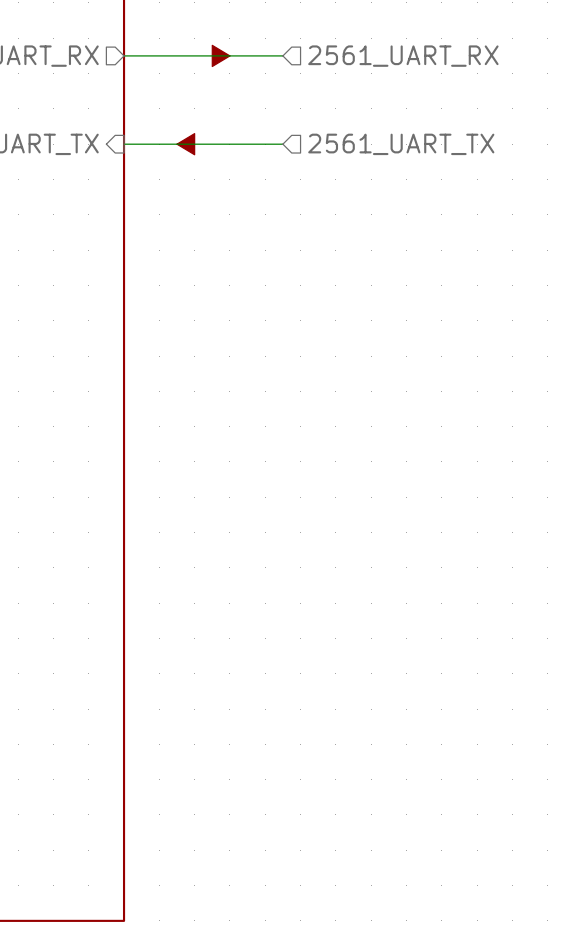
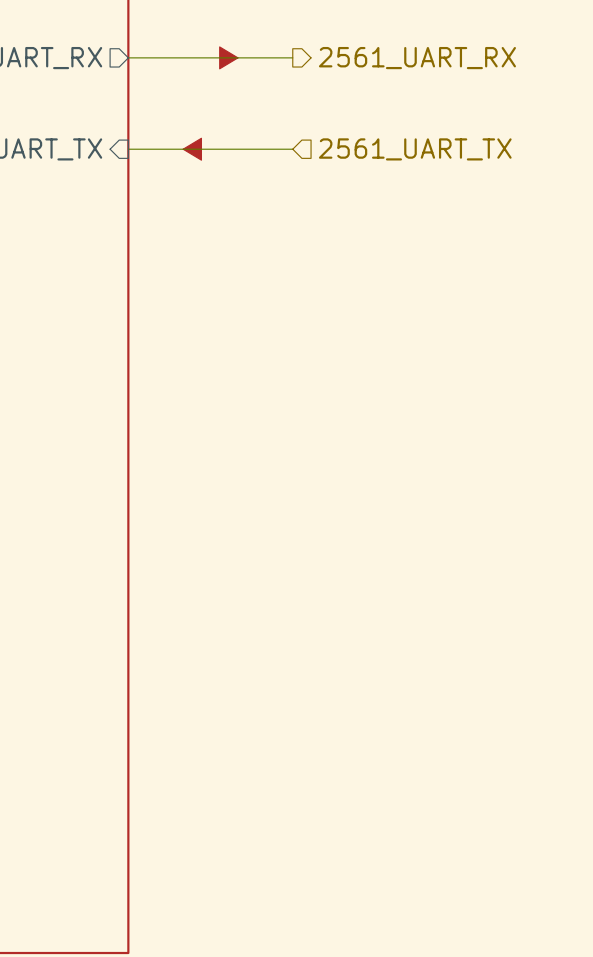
hierarchical label shape: input (403, 56) -> output (417, 58)

